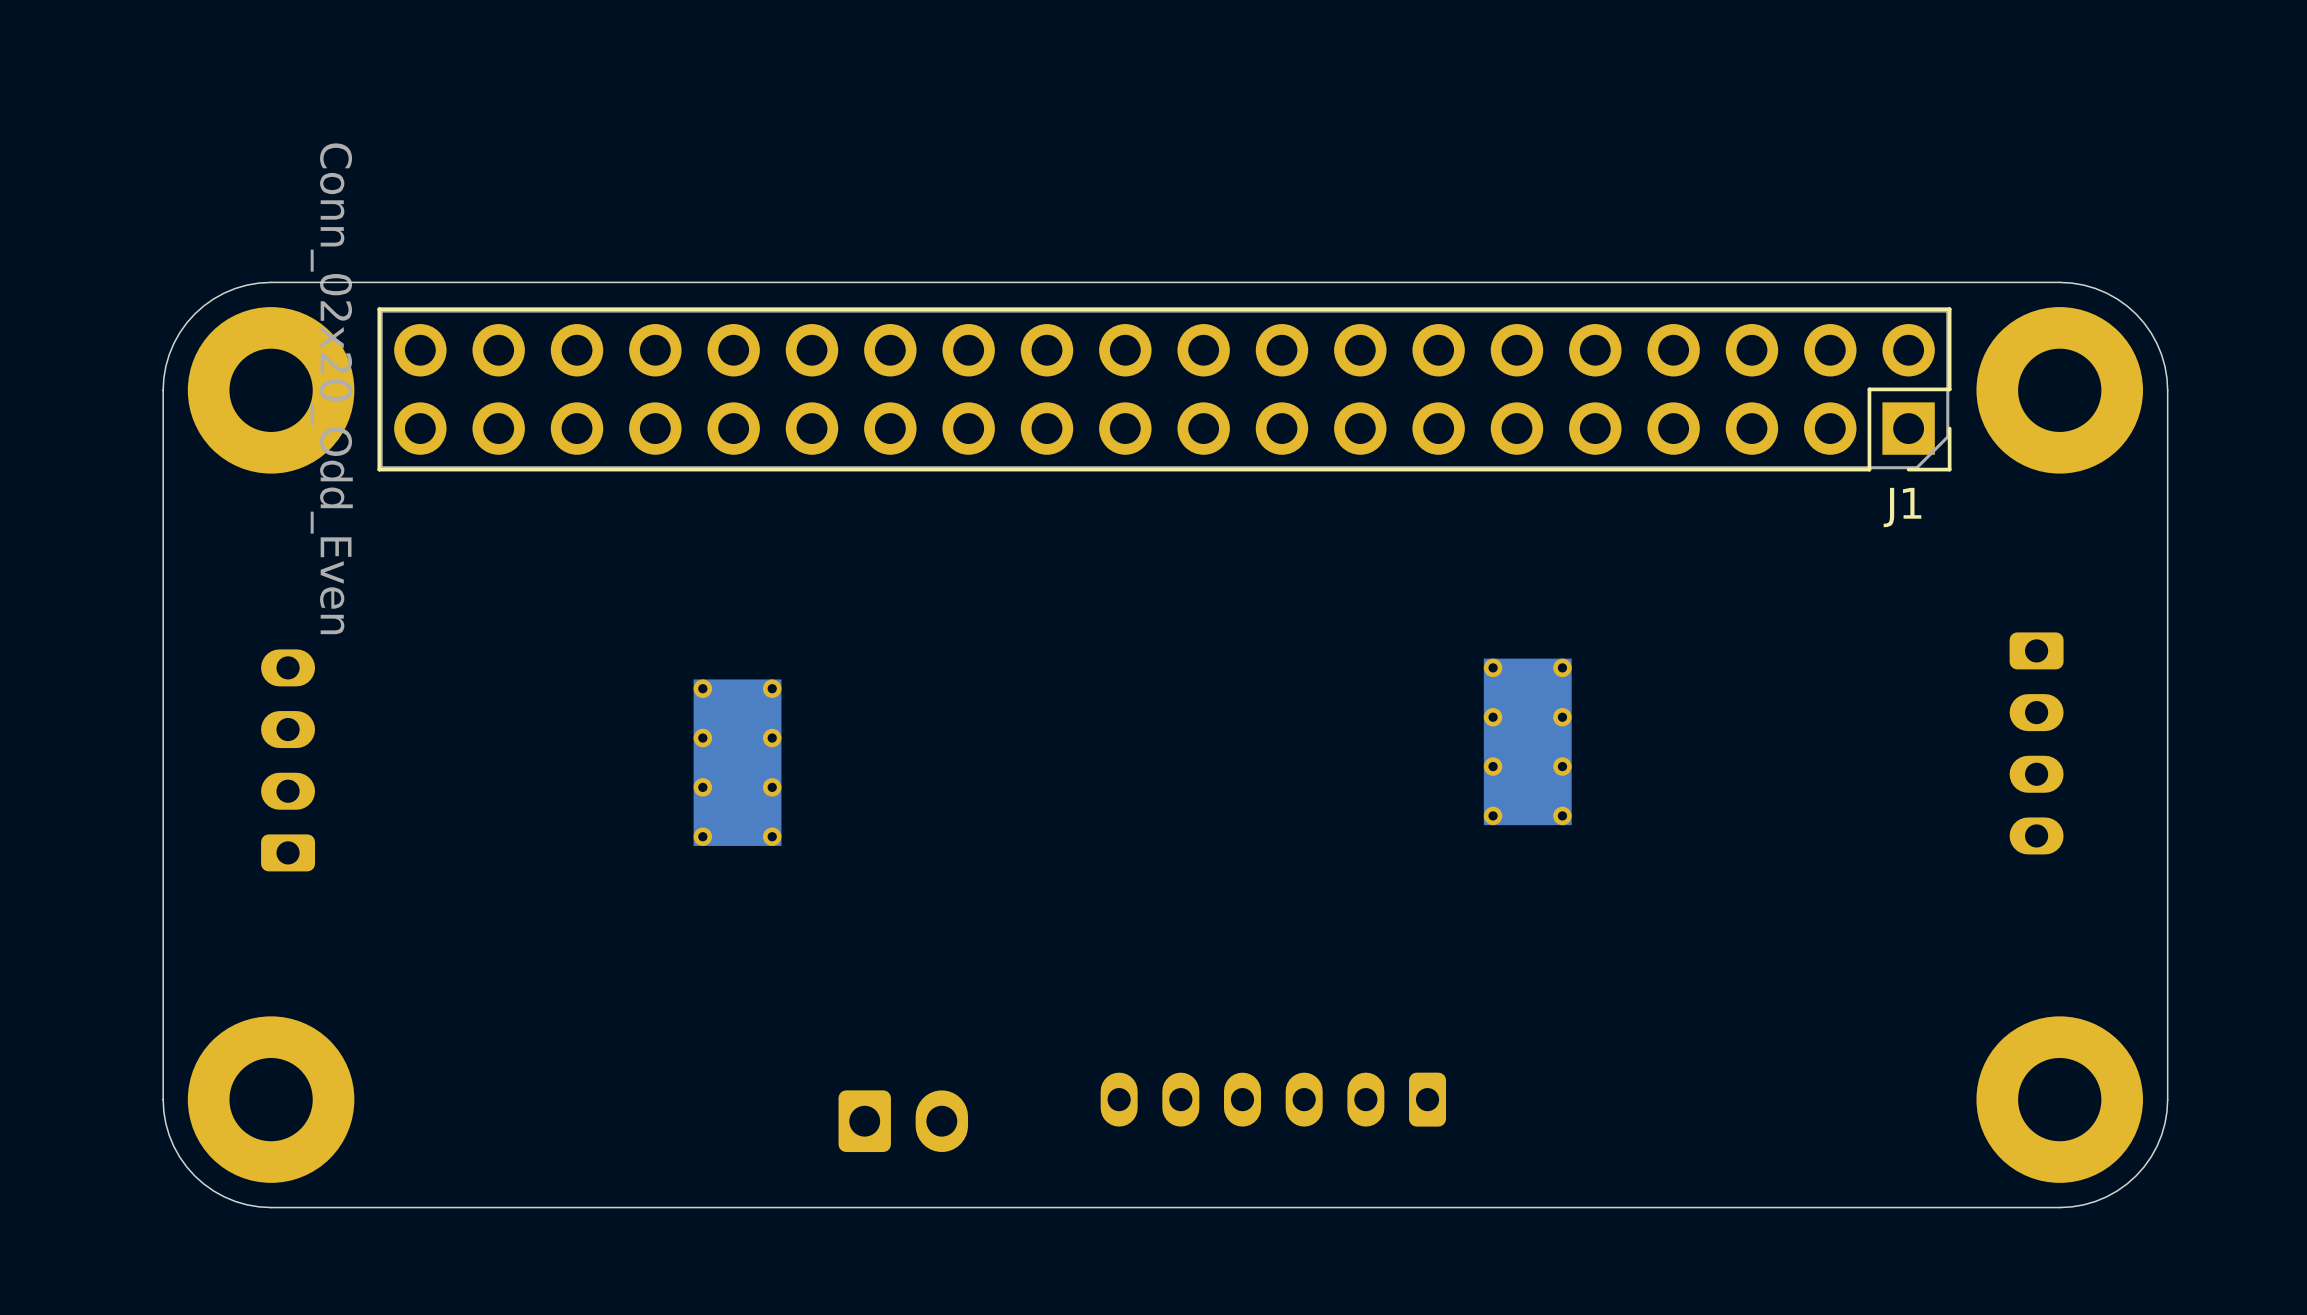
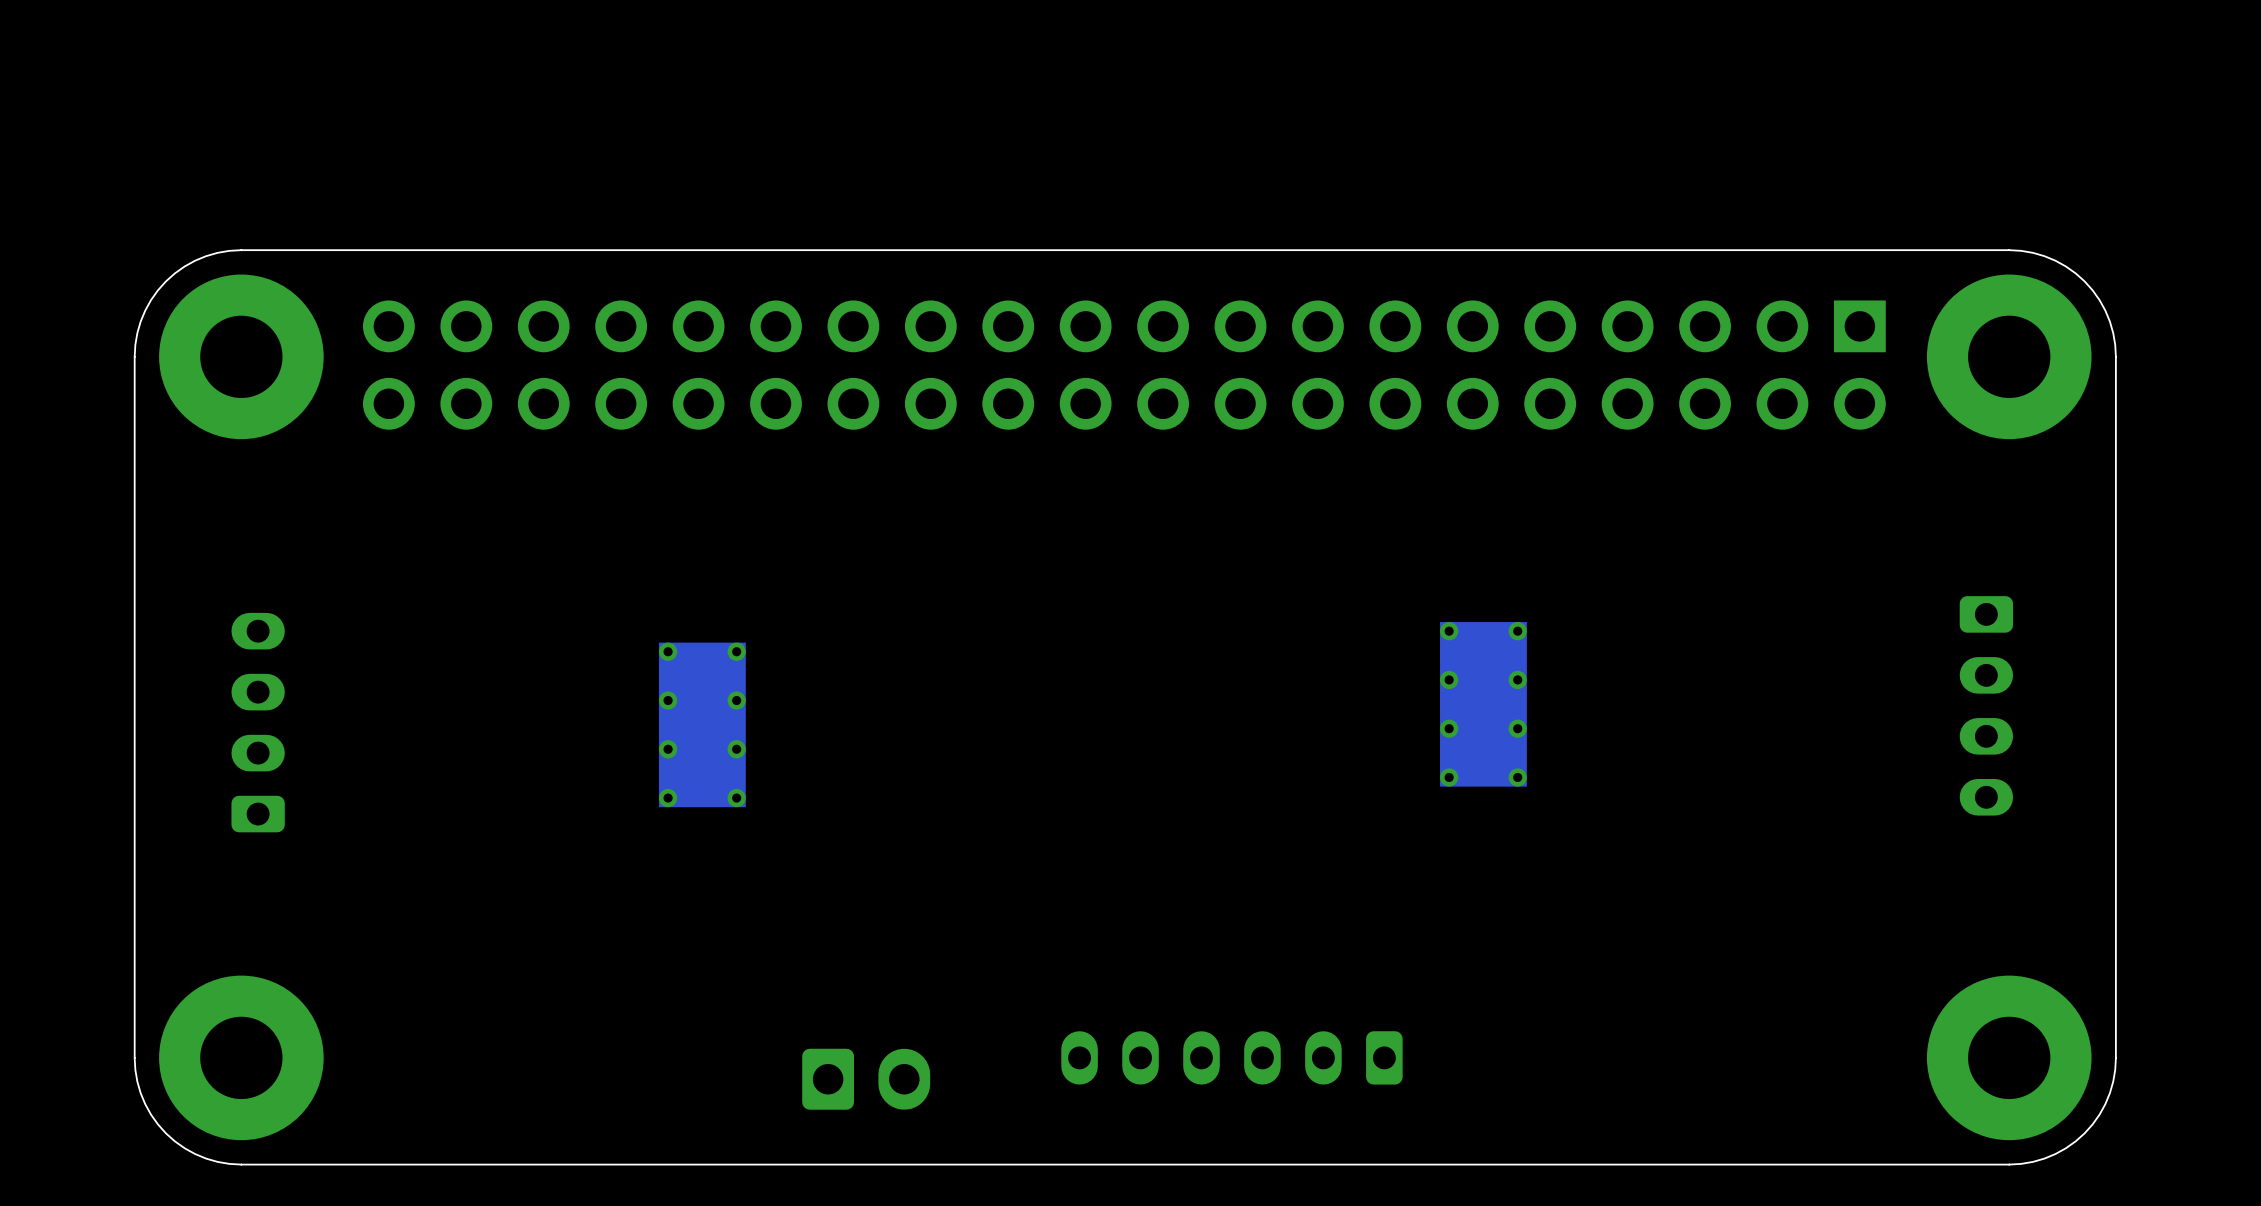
J1 side: bottom (1164, 389) -> top (1124, 365)

